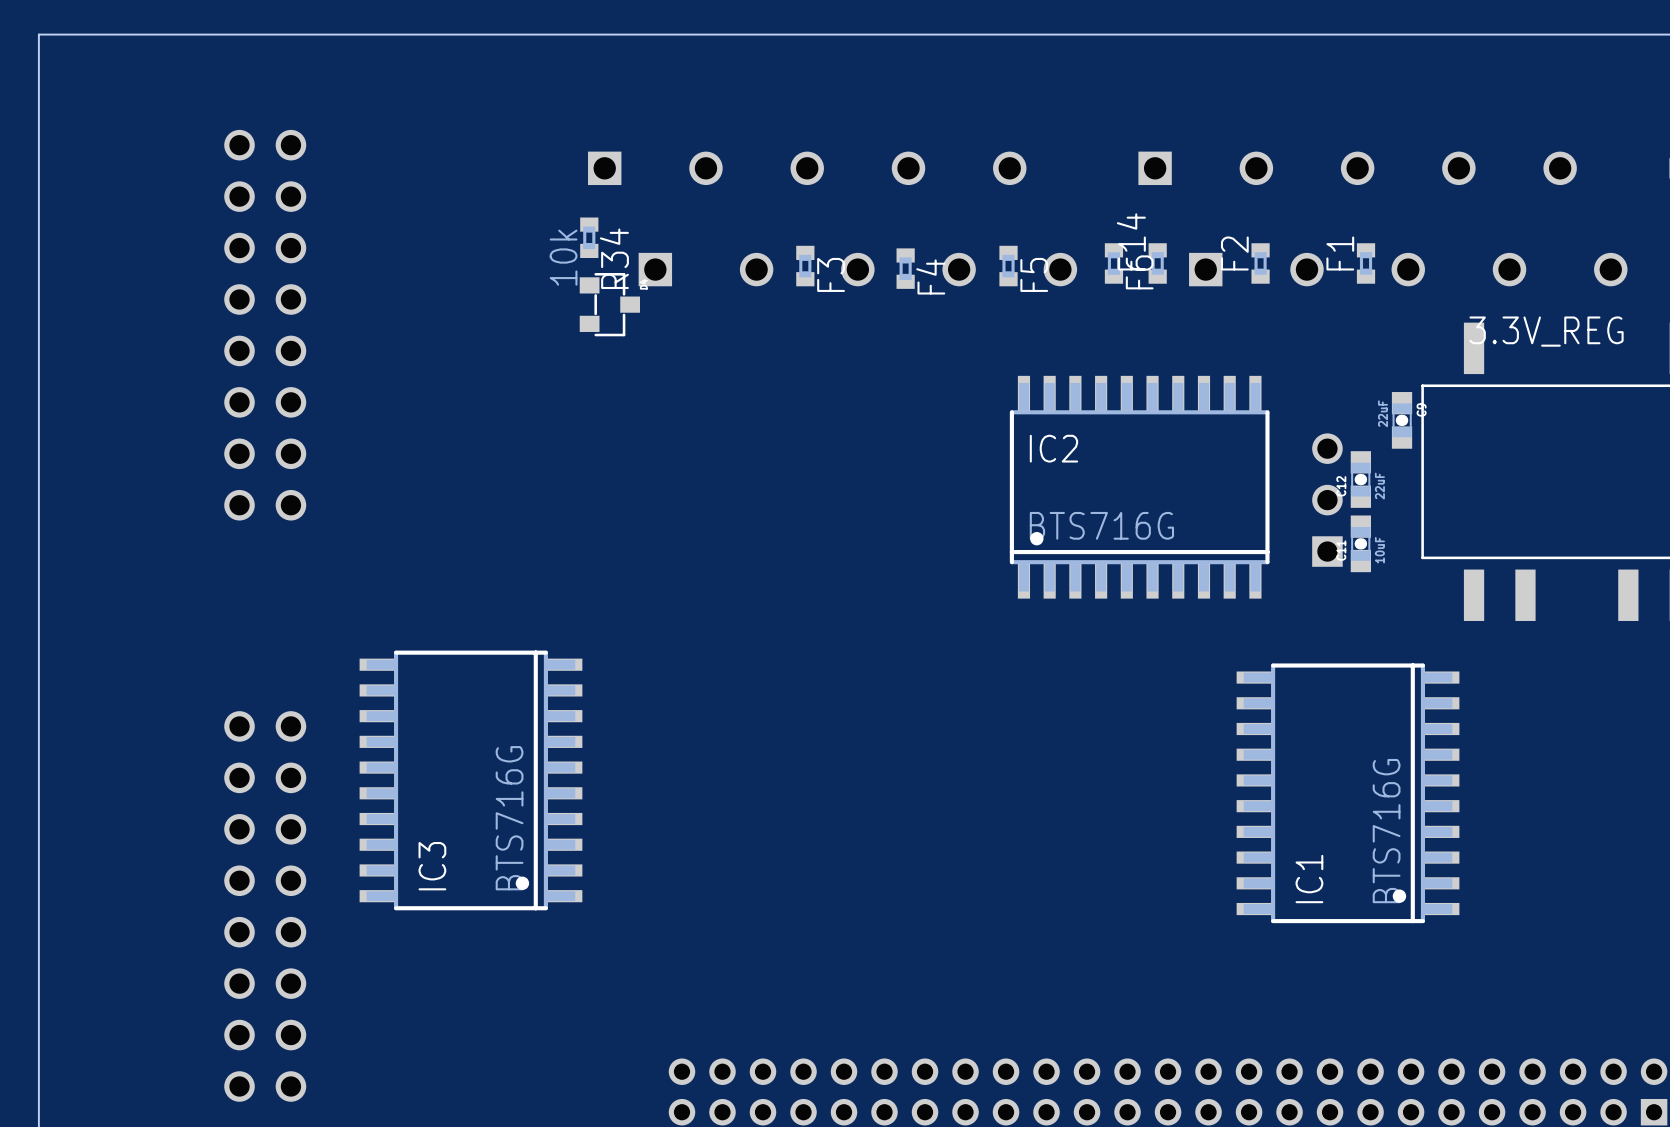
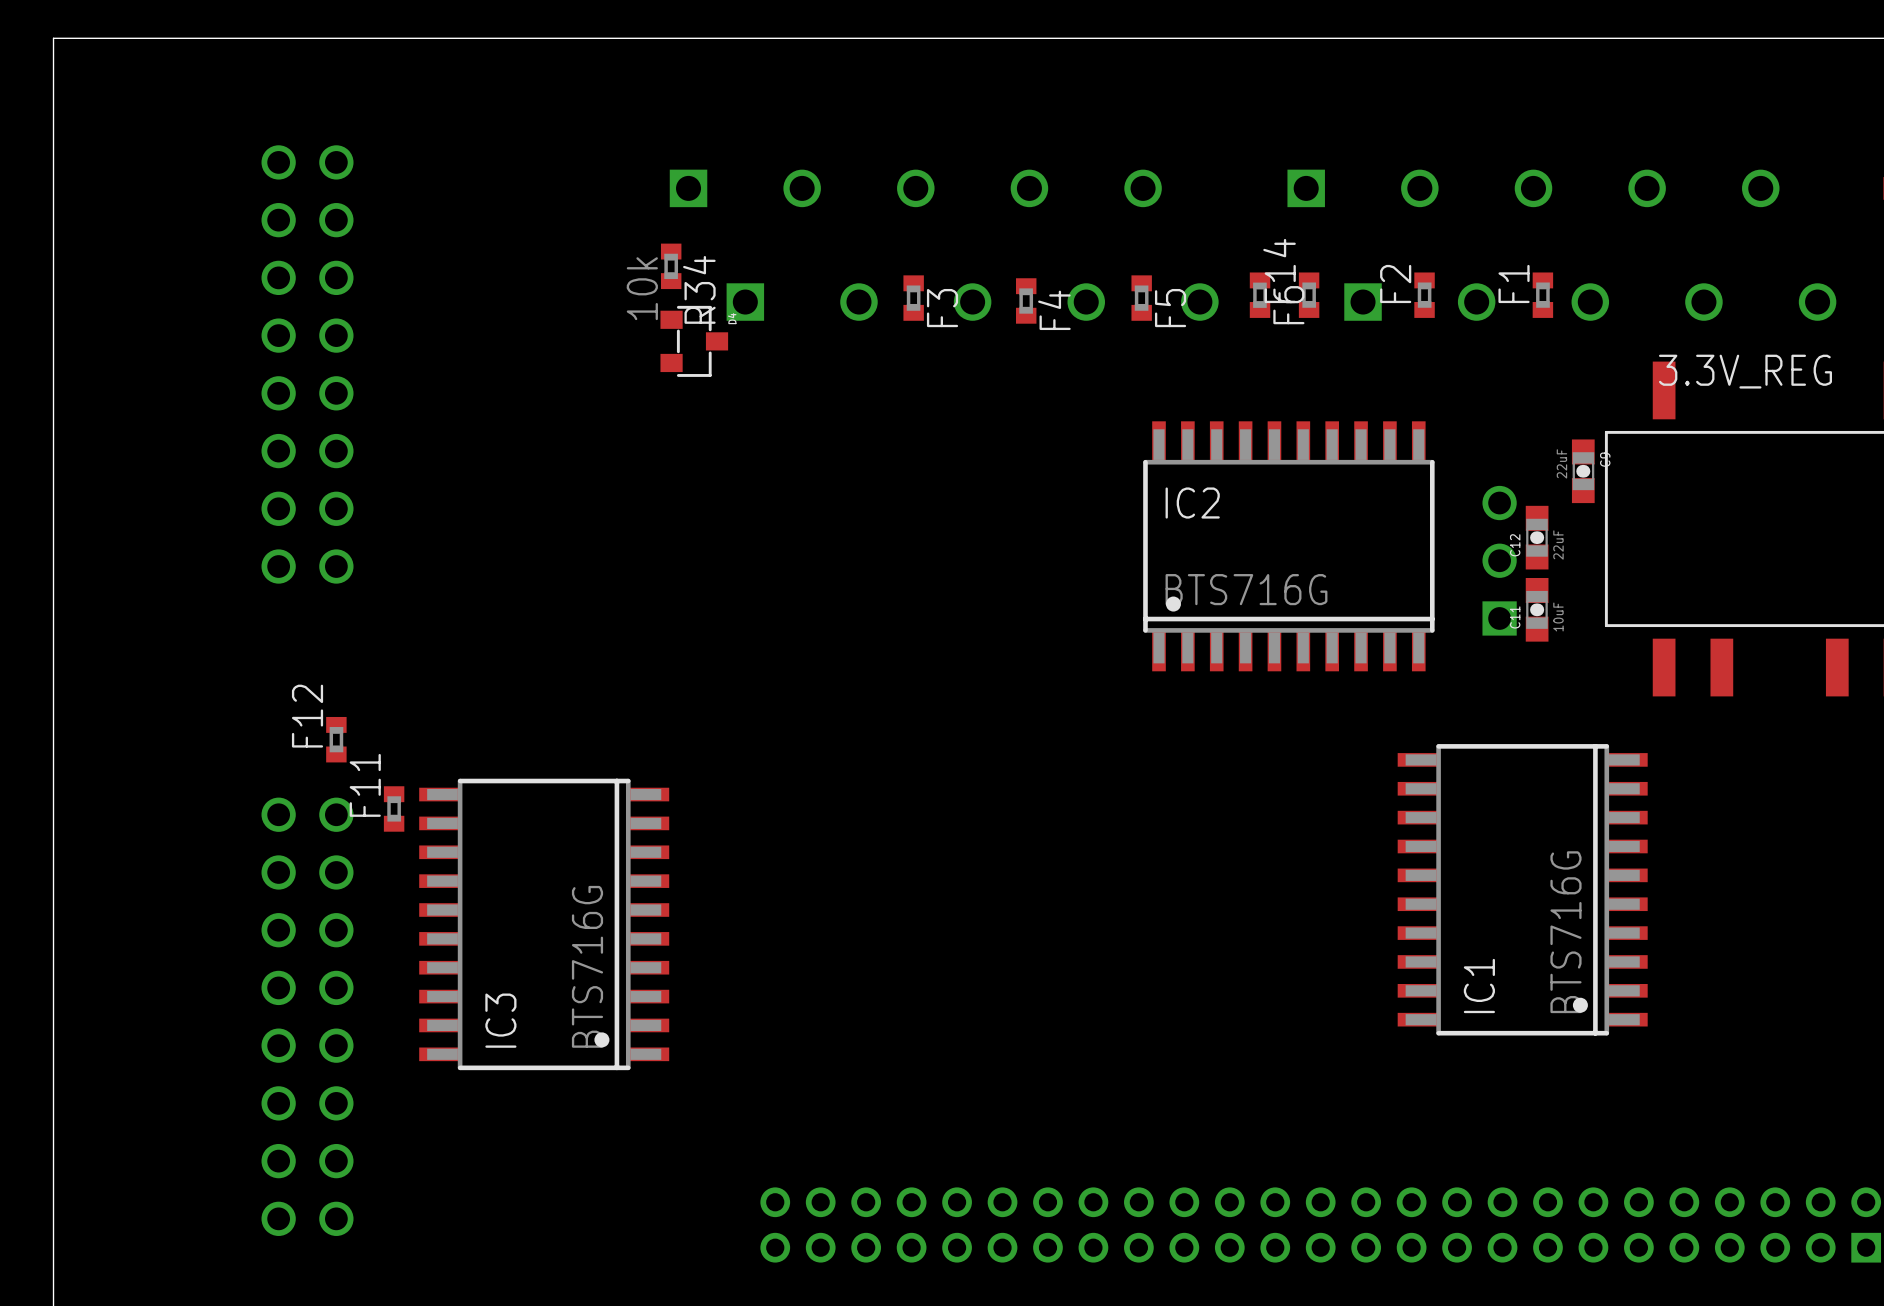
F12: none -> (336, 739)
F11: none -> (394, 808)
IC3 position: (470, 780) -> (544, 924)

